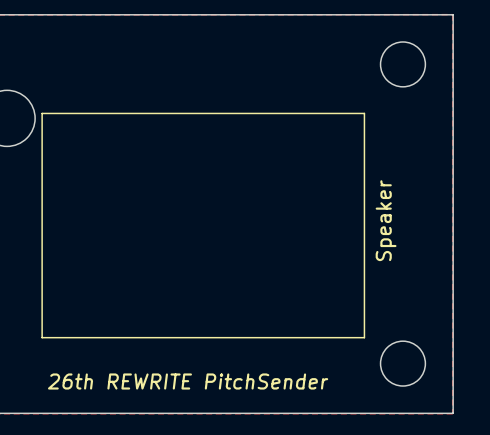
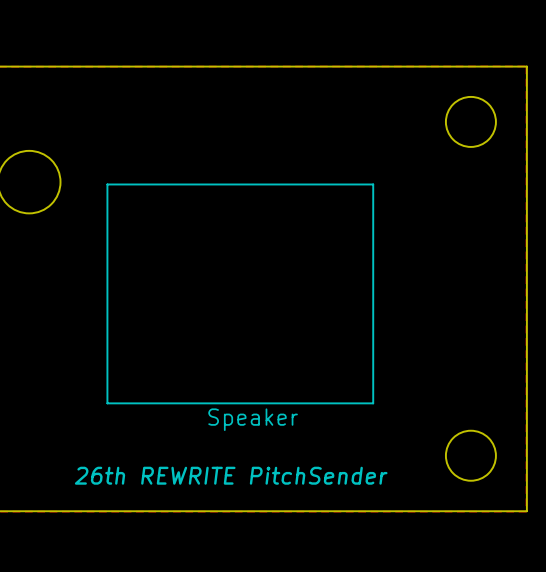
line: (42, 113) (364, 113) (364, 337) (42, 337) (42, 113) -> (107, 184) (107, 403) (373, 403) (373, 184) (107, 184)
text rotation: 0° (386, 220) -> 90° clockwise (253, 419)
text position: Speaker (386, 220) -> Speaker (253, 419)

